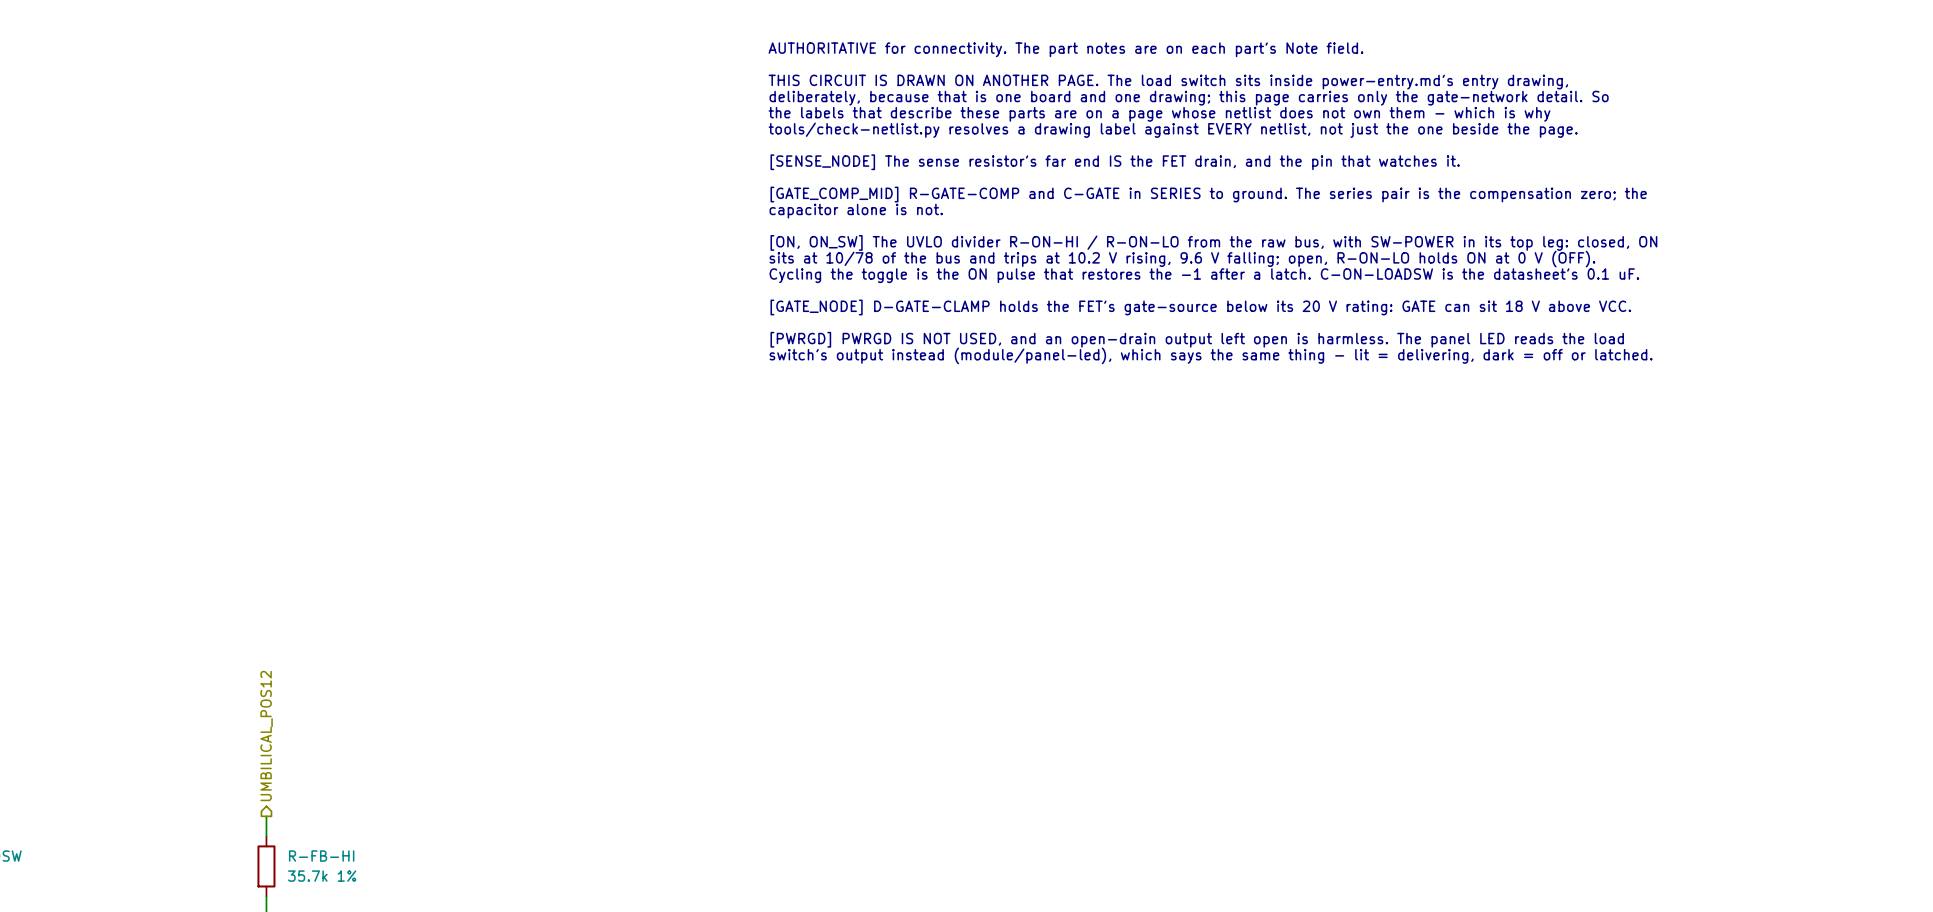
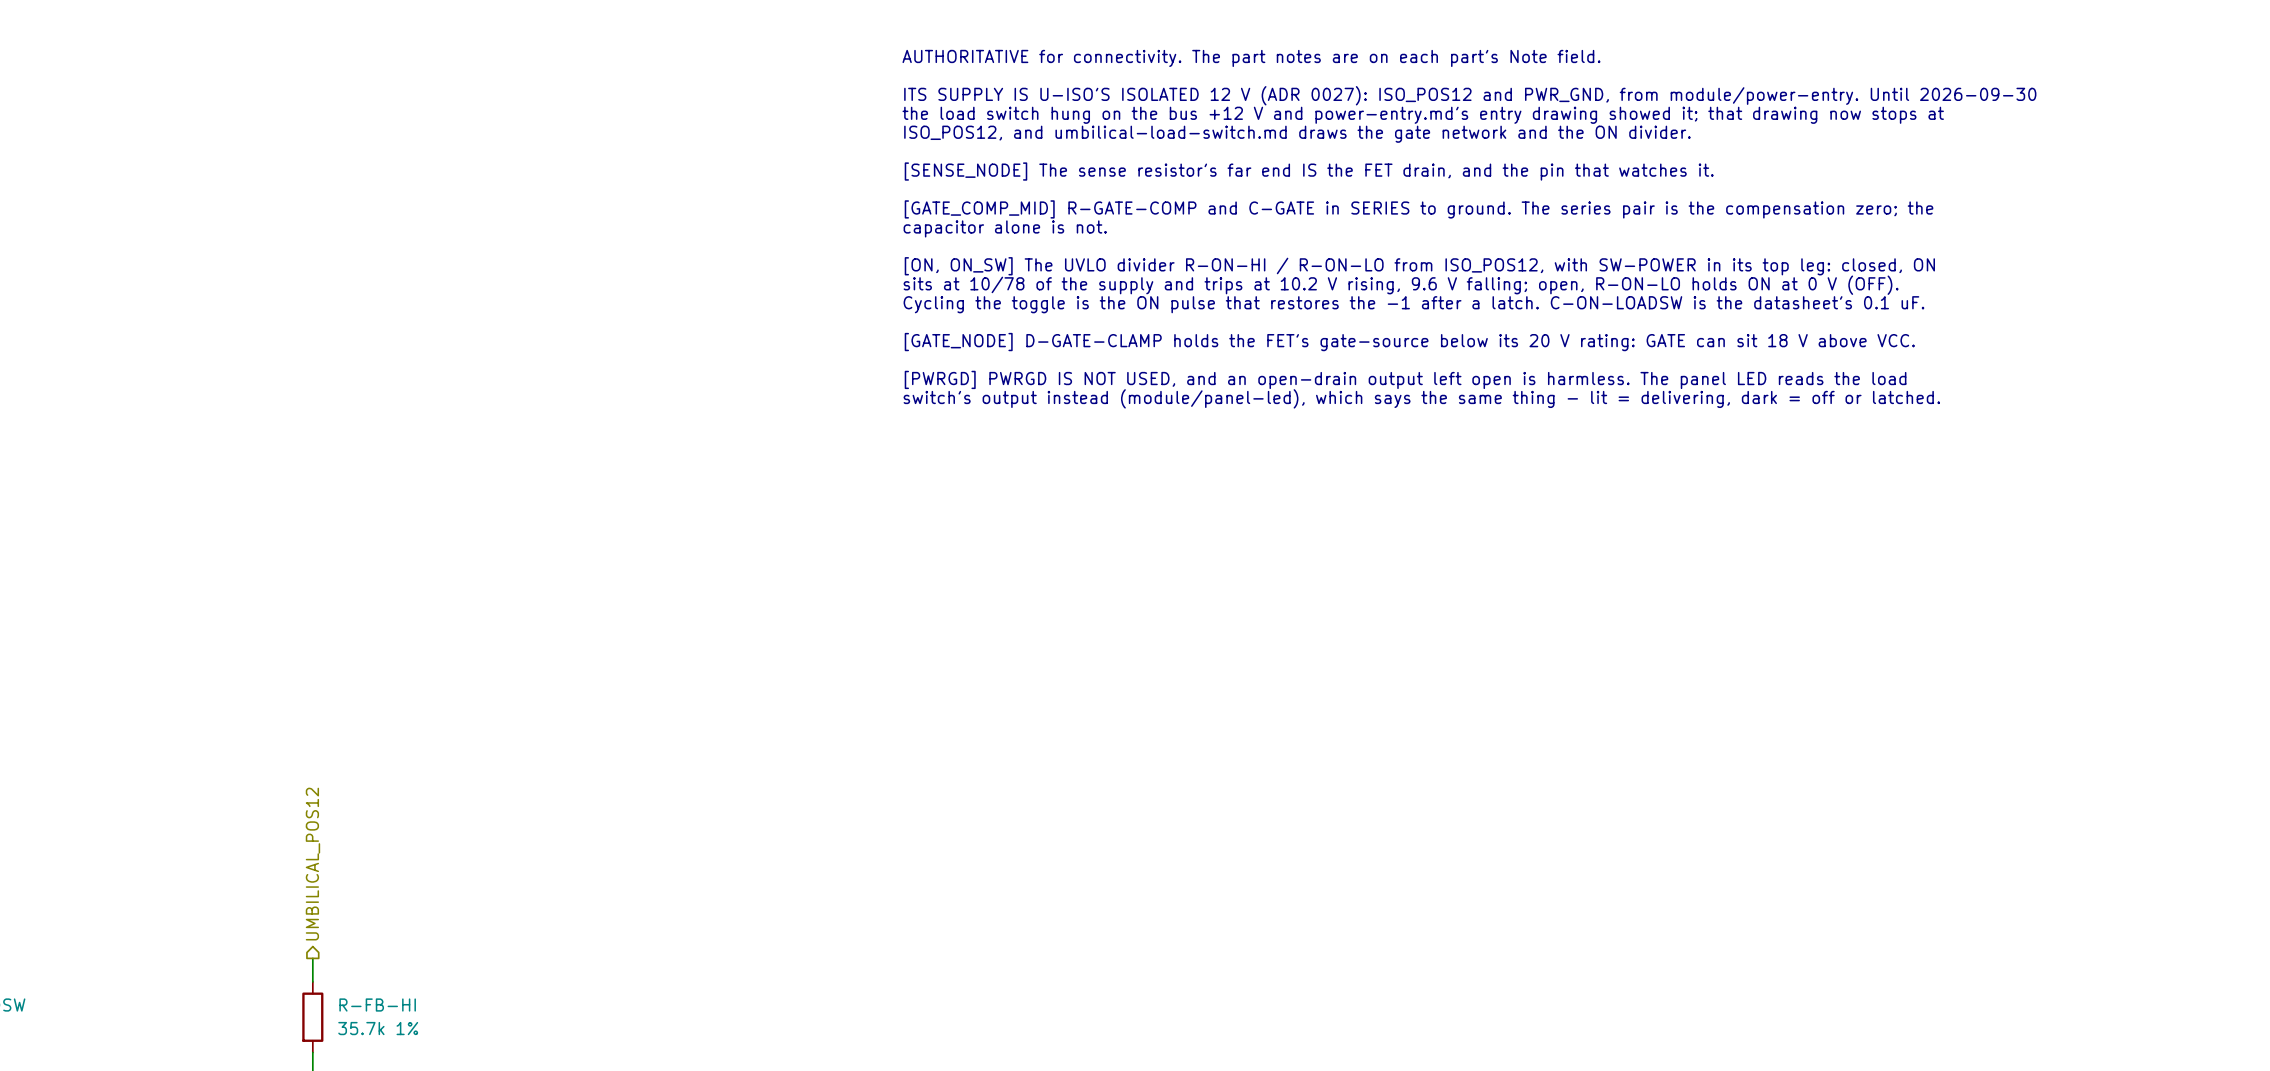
text: THIS CIRCUIT IS DRAWN ON ANOTHER PAGE. The load switch sits inside power-entry.md's entry drawing, (1168, 82) -> ITS SUPPLY IS U-ISO'S ISOLATED 12 V (ADR 0027): ISO_POS12 and PWR_GND, from module/power-entry. Until 2026-09-30 (1470, 95)
text: deliberately, because that is one board and one drawing; this page carries only the gate-network detail. So (1189, 98) -> the load switch hung on the bus +12 V and power-entry.md's entry drawing showed it; that drawing now stops at (1423, 115)
text: the labels that describe these parts are on a page whose netlist does not own them - which is why (1159, 114) -> ISO_POS12, and umbilical-load-switch.md draws the gate network and the ON divider. (1297, 134)
text: tools/check-netlist.py resolves a drawing label against EVERY netlist, not just the one beside the page. (1173, 130) -> none
text position: [SENSE_NODE] The sense resistor's far end IS the FET drain, and the pin that watches it. (1115, 162) -> [SENSE_NODE] The sense resistor's far end IS the FET drain, and the pin that watches it. (1309, 171)
text: none -> [GATE_COMP_MID] R-GATE-COMP and C-GATE in SERIES to ground. The series pair is the compensation zero; the (1419, 209)
text: [GATE_COMP_MID] R-GATE-COMP and C-GATE in SERIES to ground. The series pair is the compensation zero; the (1208, 194) -> capacitor alone is not. (1005, 228)
text: capacitor alone is not. (856, 211) -> none
text: none -> [ON, ON_SW] The UVLO divider R-ON-HI / R-ON-LO from ISO_POS12, with SW-POWER in its top leg: closed, ON (1419, 266)
text: [ON, ON_SW] The UVLO divider R-ON-HI / R-ON-LO from the raw bus, with SW-POWER in its top leg: closed, ON (1213, 242) -> sits at 10/78 of the supply and trips at 10.2 V rising, 9.6 V falling; open, R-ON-LO holds ON at 0 V (OFF). (1401, 285)
text: sits at 10/78 of the bus and trips at 10.2 V rising, 9.6 V falling; open, R-ON-LO holds ON at 0 V (OFF). (1182, 259) -> Cycling the toggle is the ON pulse that restores the -1 after a latch. C-ON-LOADSW is the datasheet's 0.1 uF. (1413, 304)
text: Cycling the toggle is the ON pulse that restores the -1 after a latch. C-ON-LOADSW is the datasheet's 0.1 uF. (1204, 275) -> none
text position: [GATE_NODE] D-GATE-CLAMP holds the FET's gate-source below its 20 V rating: GATE can sit 18 V above VCC. (1200, 307) -> [GATE_NODE] D-GATE-CLAMP holds the FET's gate-source below its 20 V rating: GATE can sit 18 V above VCC. (1409, 342)
text: none -> [PWRGD] PWRGD IS NOT USED, and an open-drain output left open is harmless. The panel LED reads the load (1405, 379)
text: [PWRGD] PWRGD IS NOT USED, and an open-drain output left open is harmless. The panel LED reads the load (1197, 339) -> switch's output instead (module/panel-led), which says the same thing - lit = delivering, dark = off or latched. (1421, 398)
text: switch's output instead (module/panel-led), which says the same thing - lit = delivering, dark = off or latched. (1211, 355) -> none

